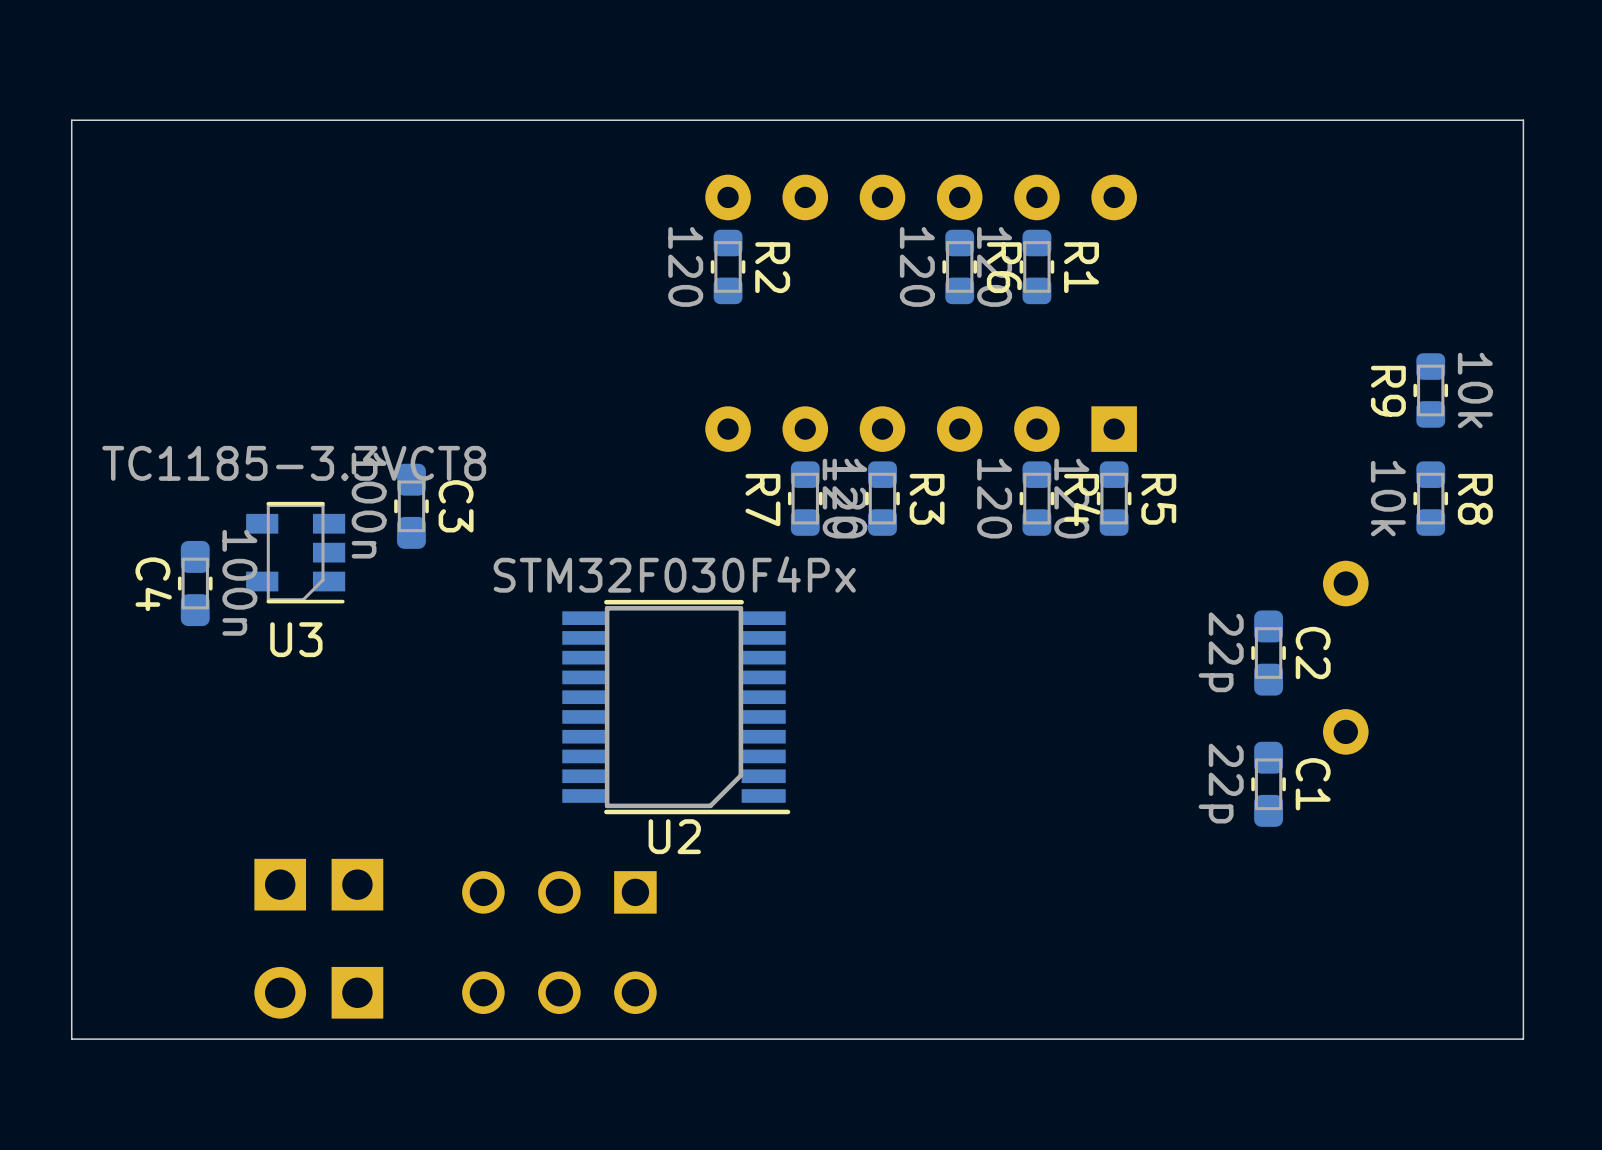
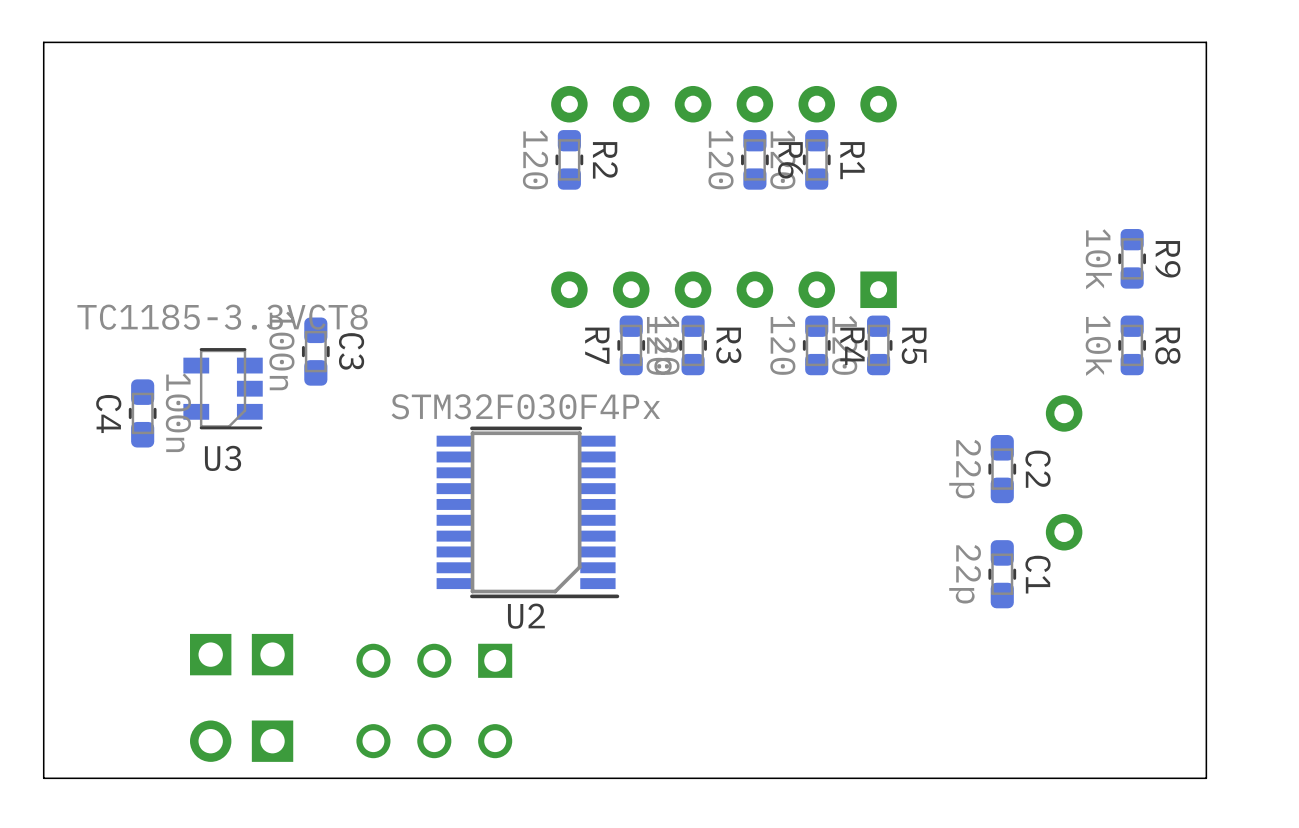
R9 value position: 10k (1475, 390) -> 10k (1098, 259)
R9 name position: R9 (1388, 391) -> R9 (1168, 259)

